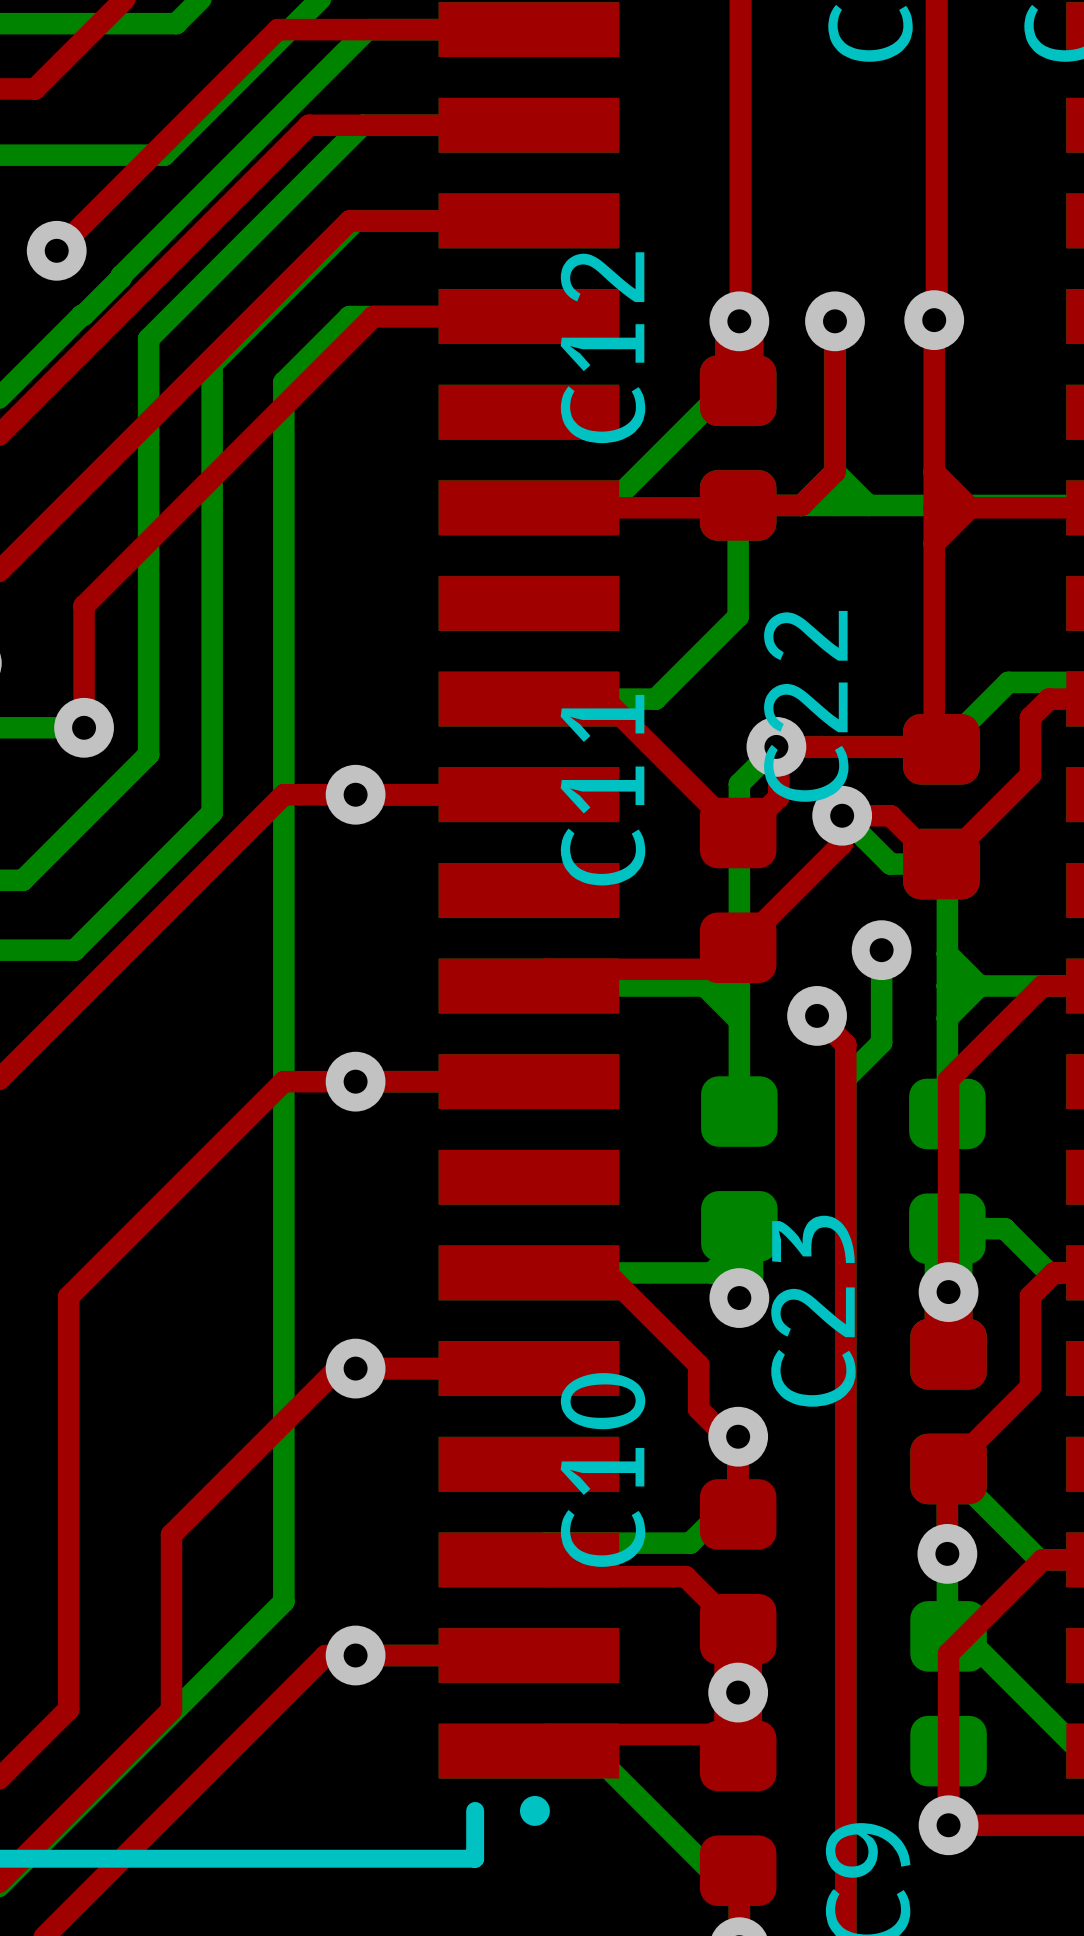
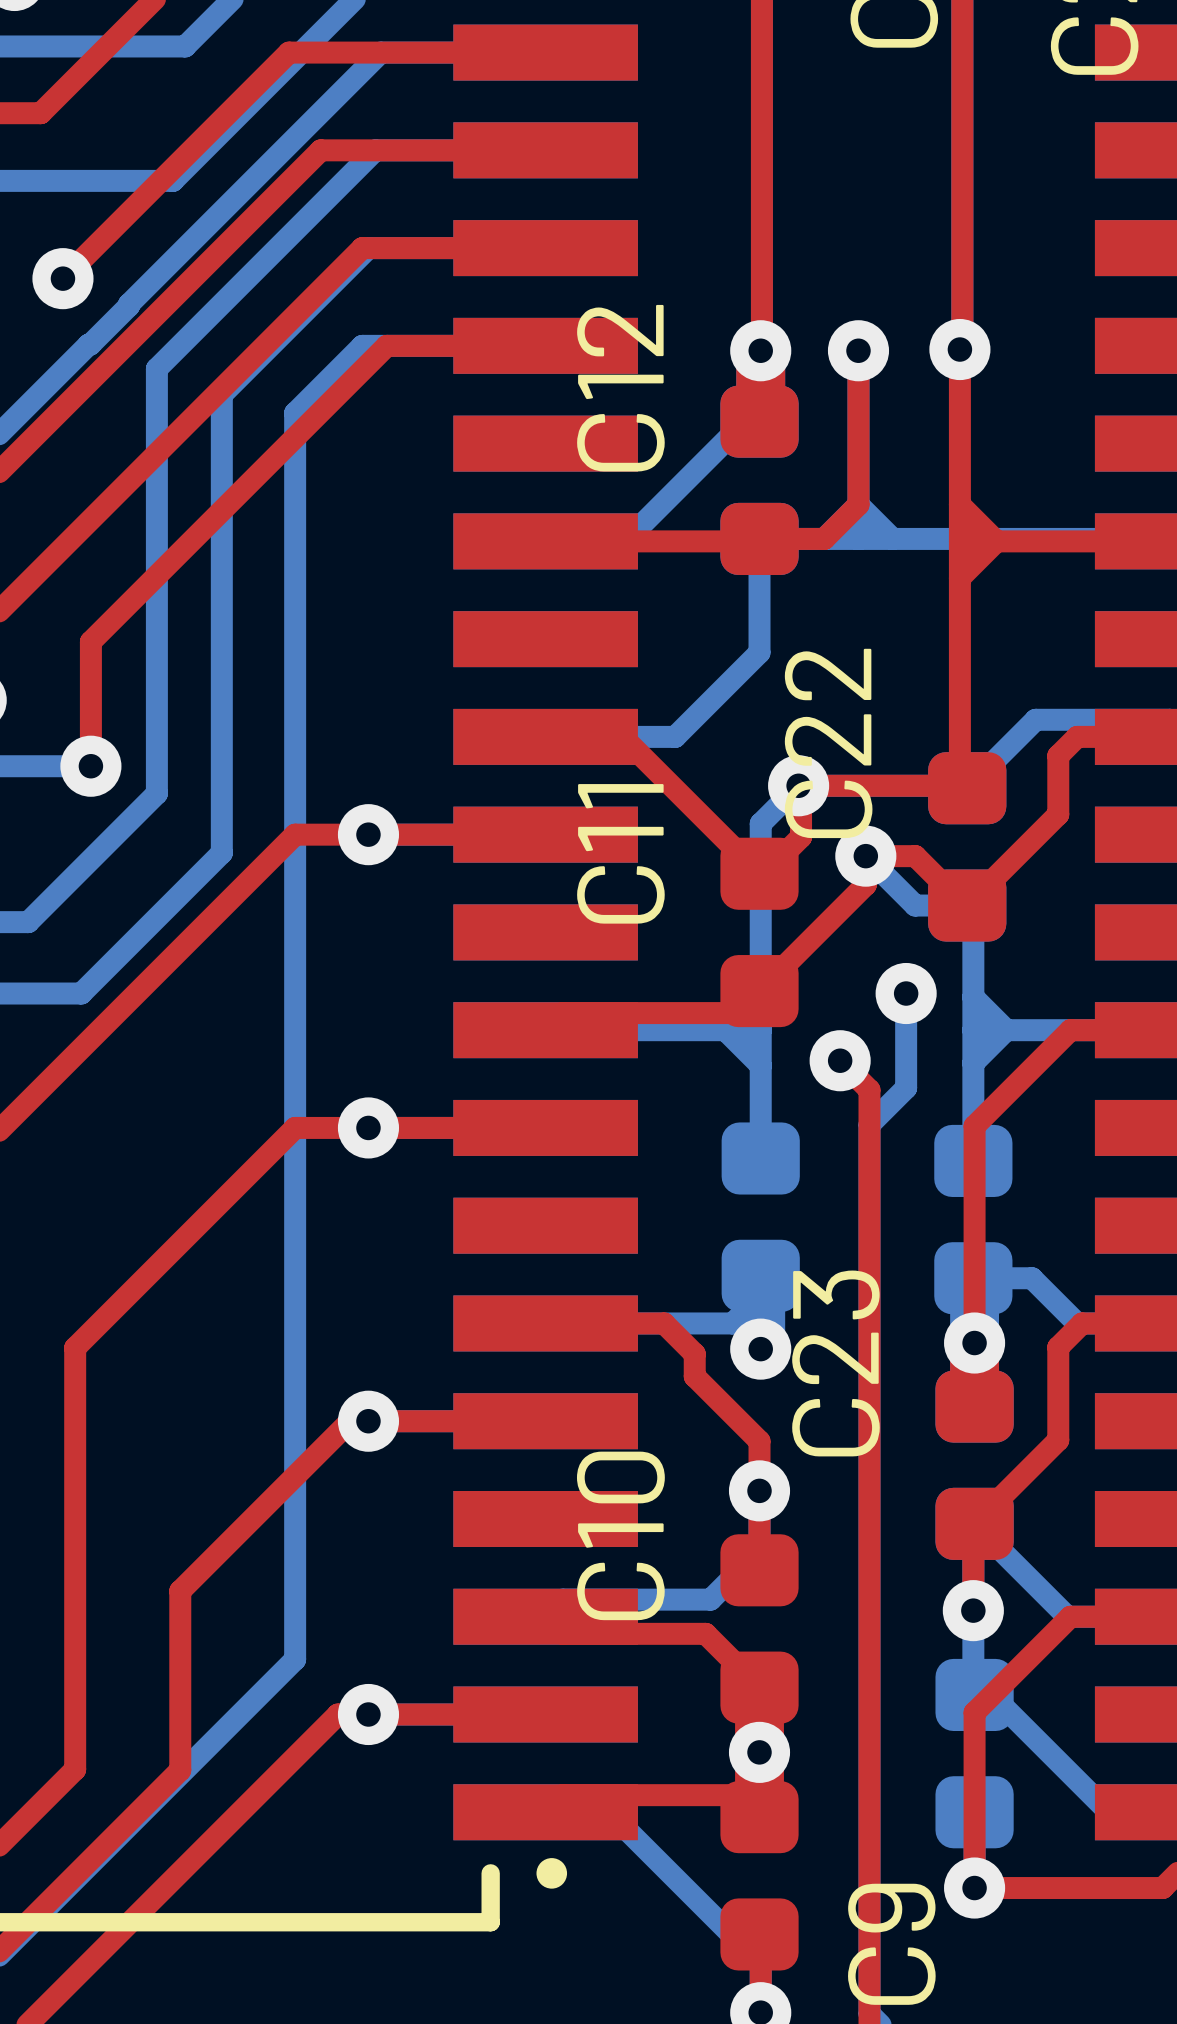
top track: (606, 1272) (698, 1364) (698, 1409) (726, 1436) (738, 1436) -> (625, 1323) (664, 1323) (694, 1354) (694, 1376) (759, 1441) (759, 1490)

